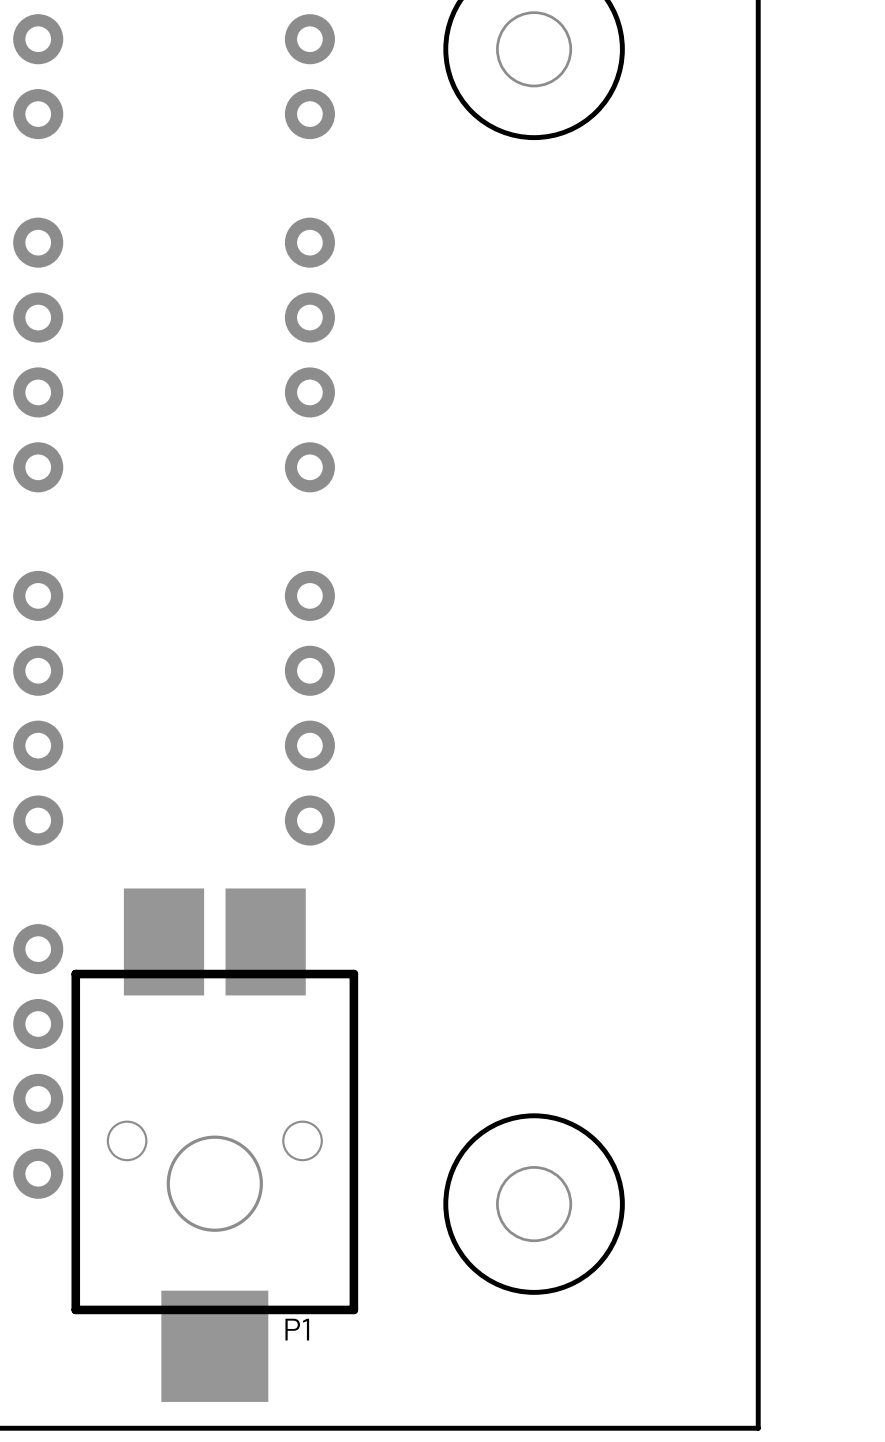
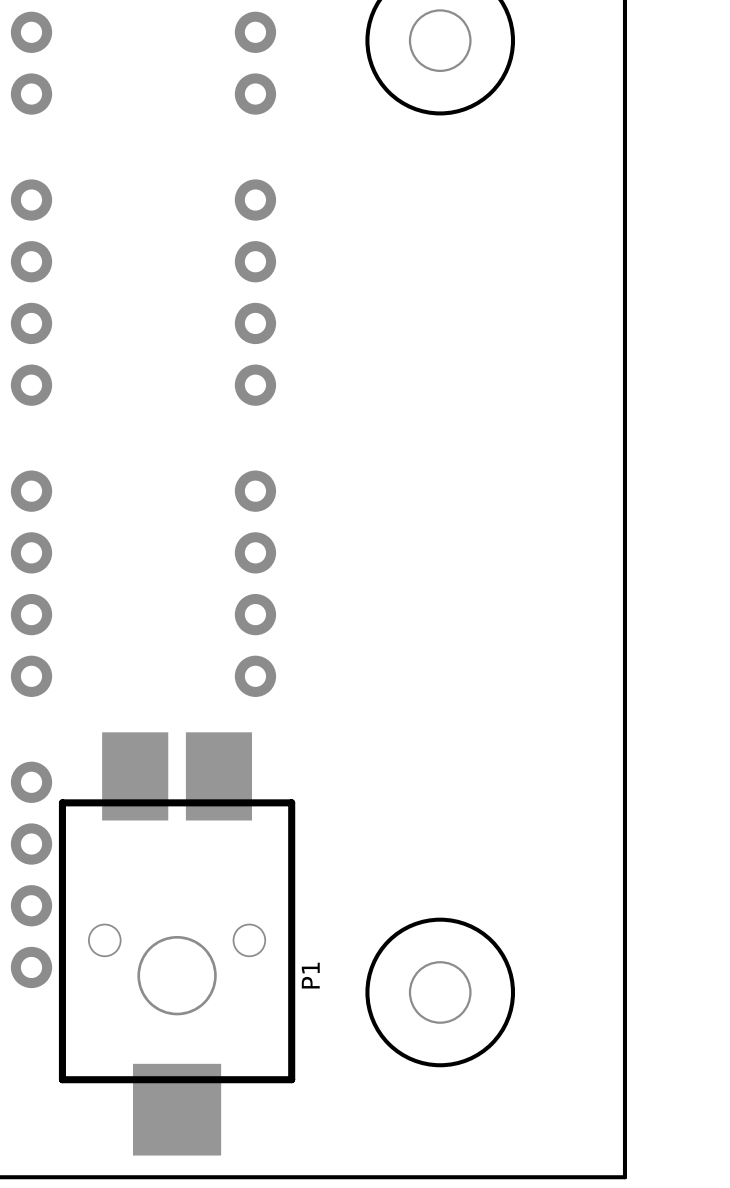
P1 name rotation: 0° (297, 1329) -> 90° counterclockwise (310, 975)
P1 name position: P1 (297, 1329) -> P1 (310, 975)

